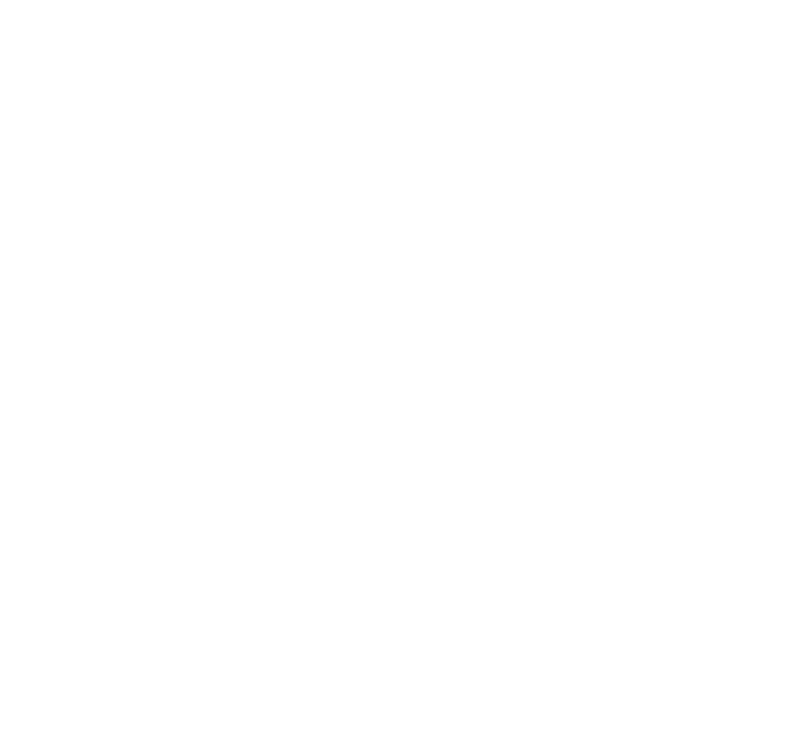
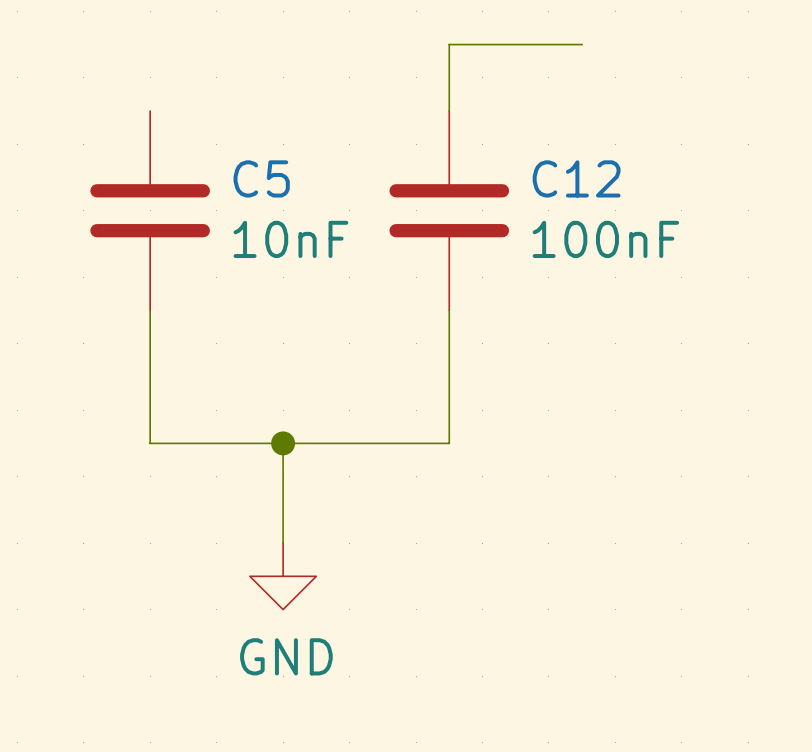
wire: none -> (582, 44) (449, 44) (449, 111)
C5: none -> 10nF (150, 210)
C12: none -> 100nF (449, 210)
wire: none -> (150, 310) (150, 443) (449, 443) (449, 310)
wire: none -> (283, 443) (283, 543)
junction: none -> (283, 443)
power symbol: none -> GND (283, 576)

